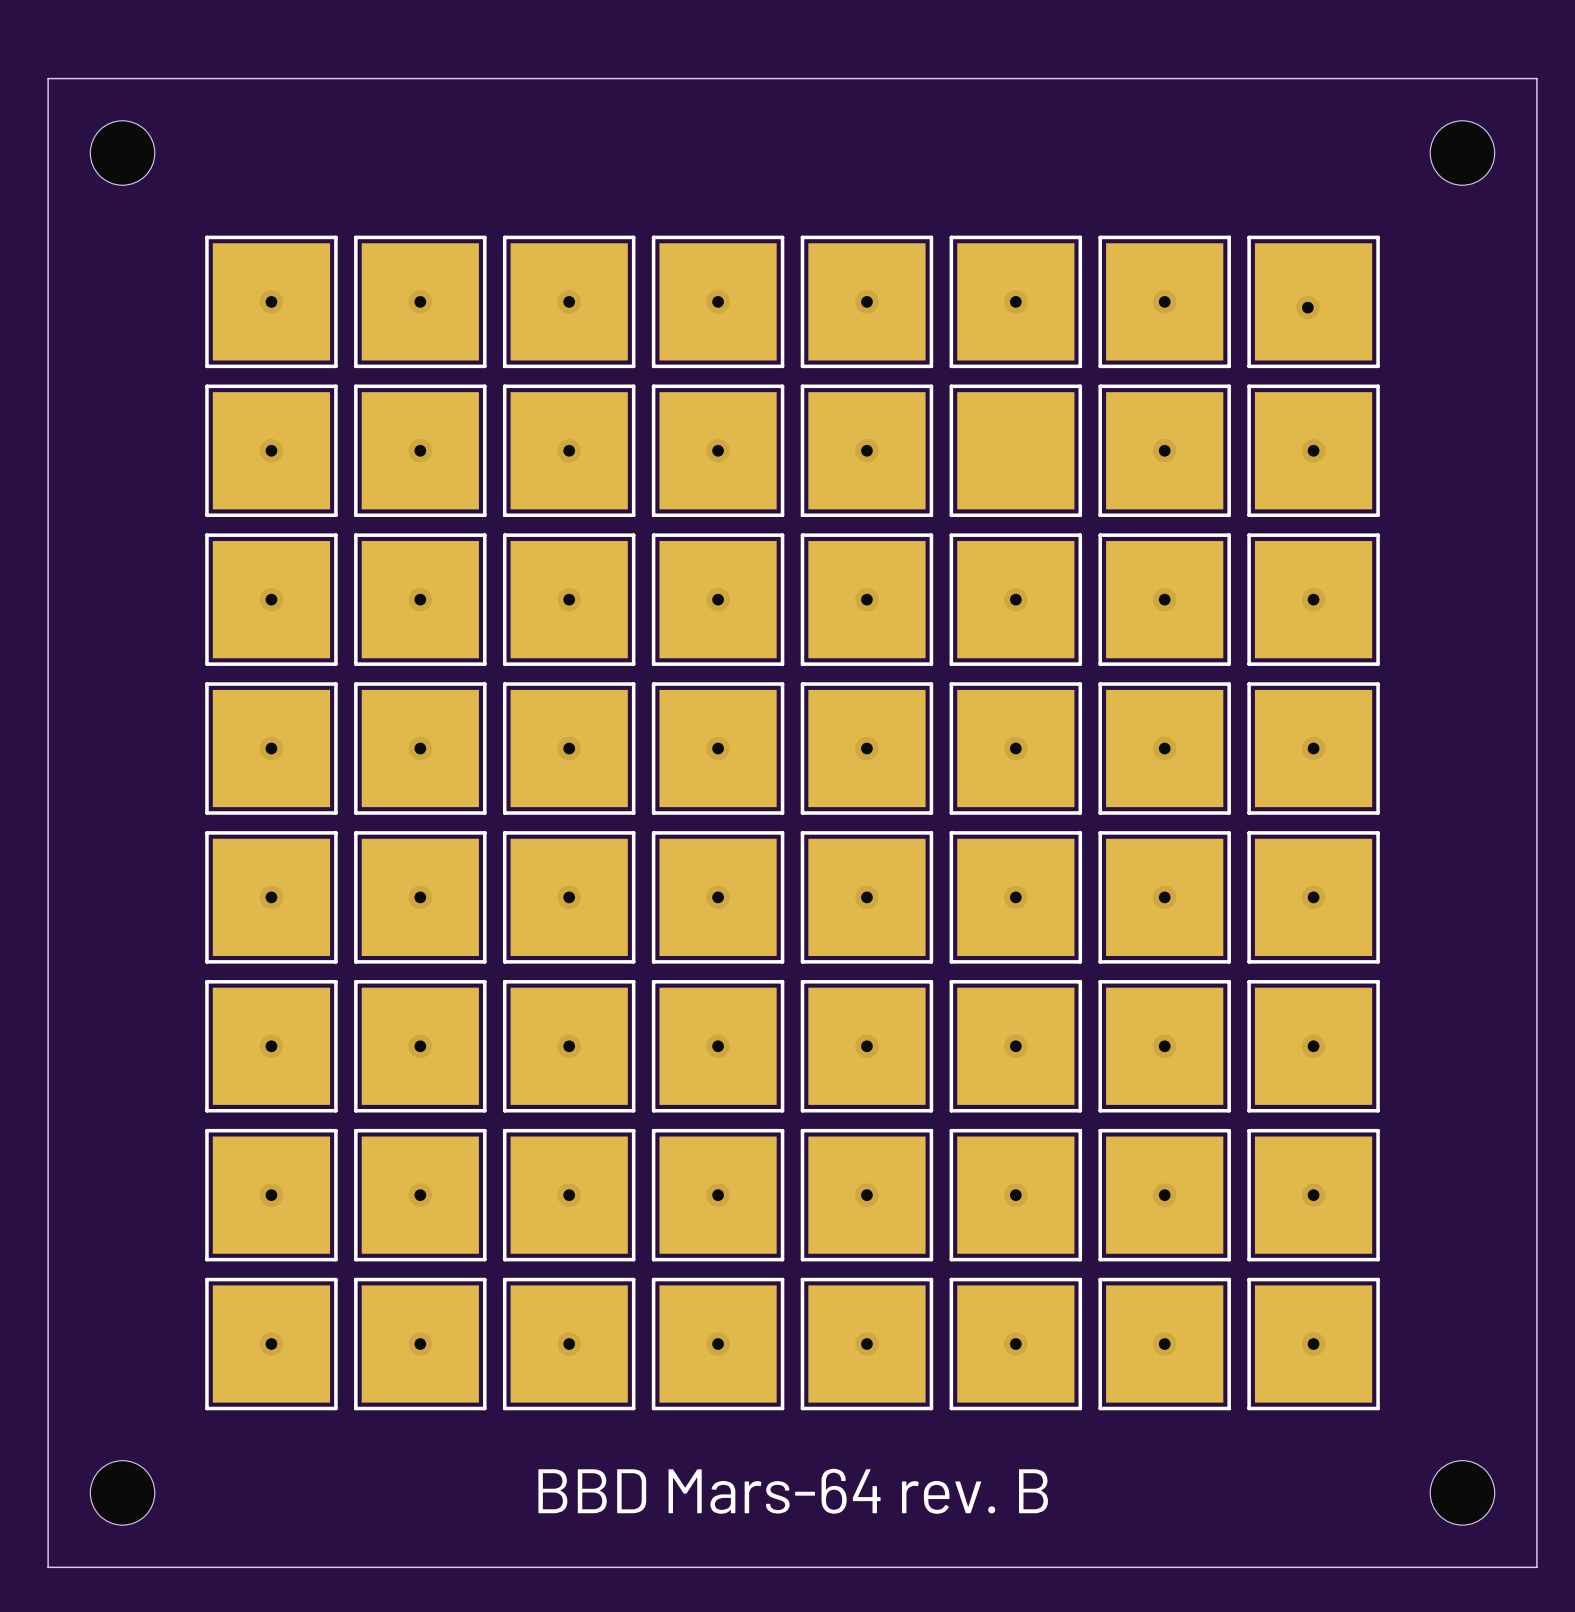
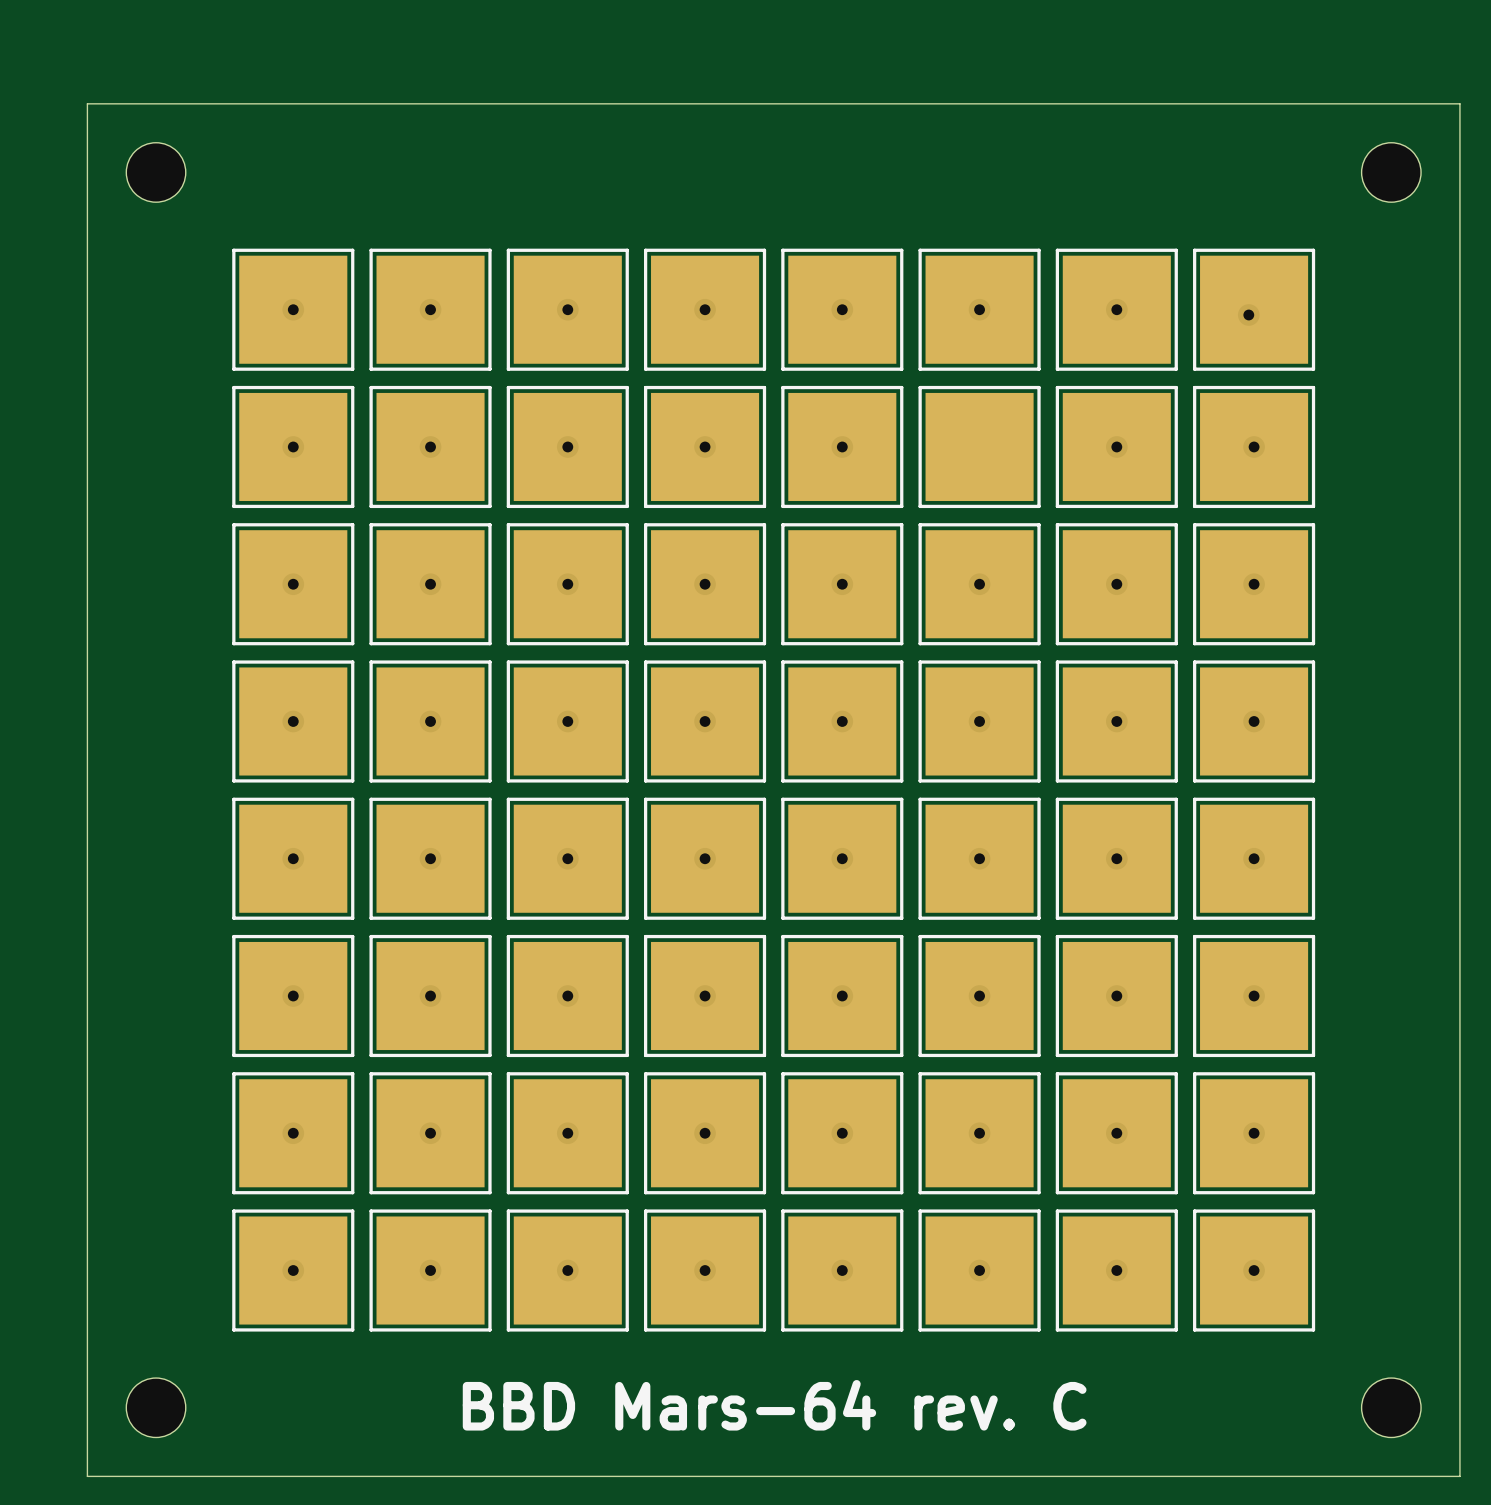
text: BBD Mars-64 rev. B (793, 1491) -> BBD Mars-64 rev. C (774, 1405)

